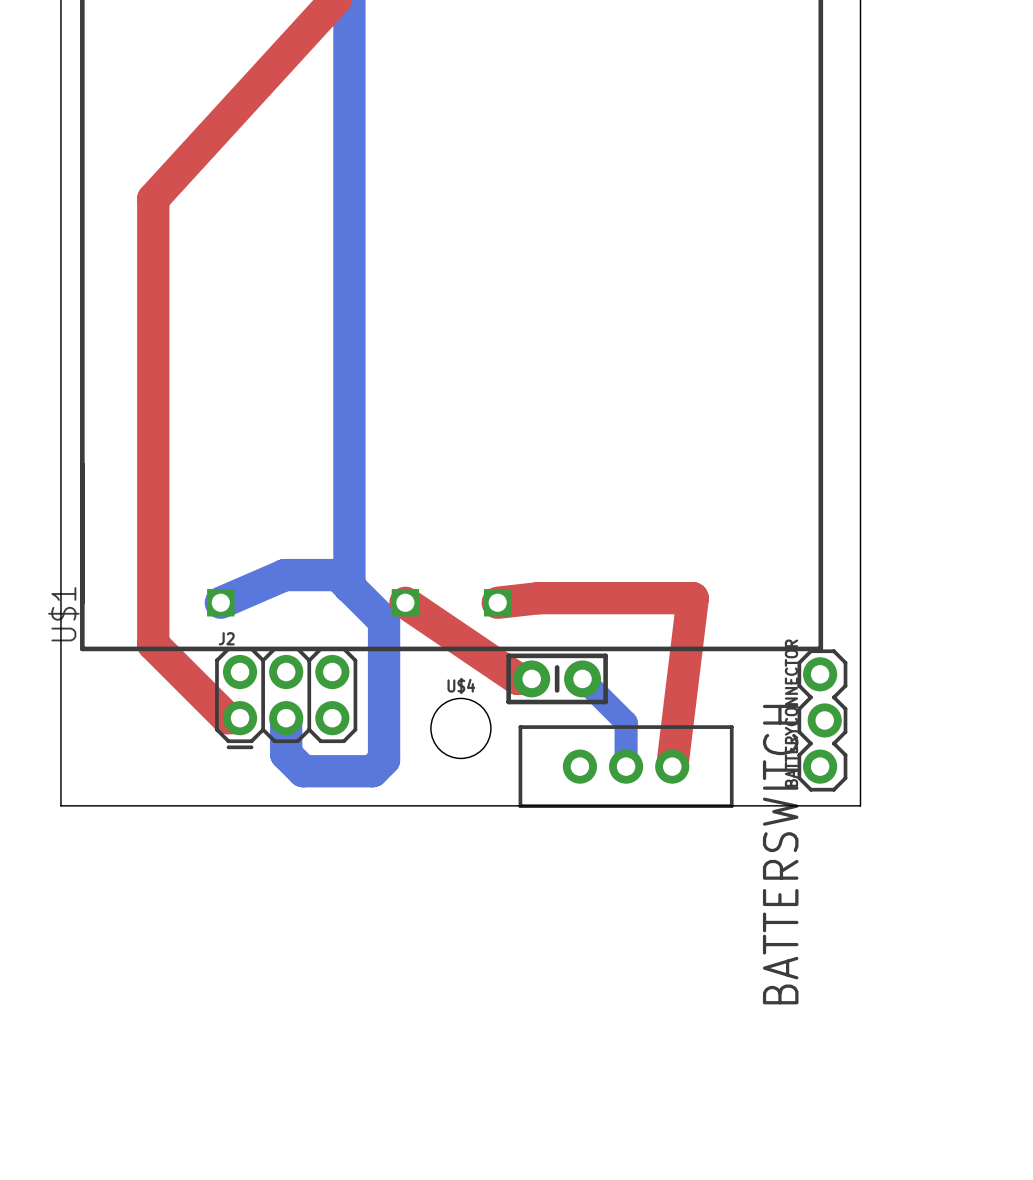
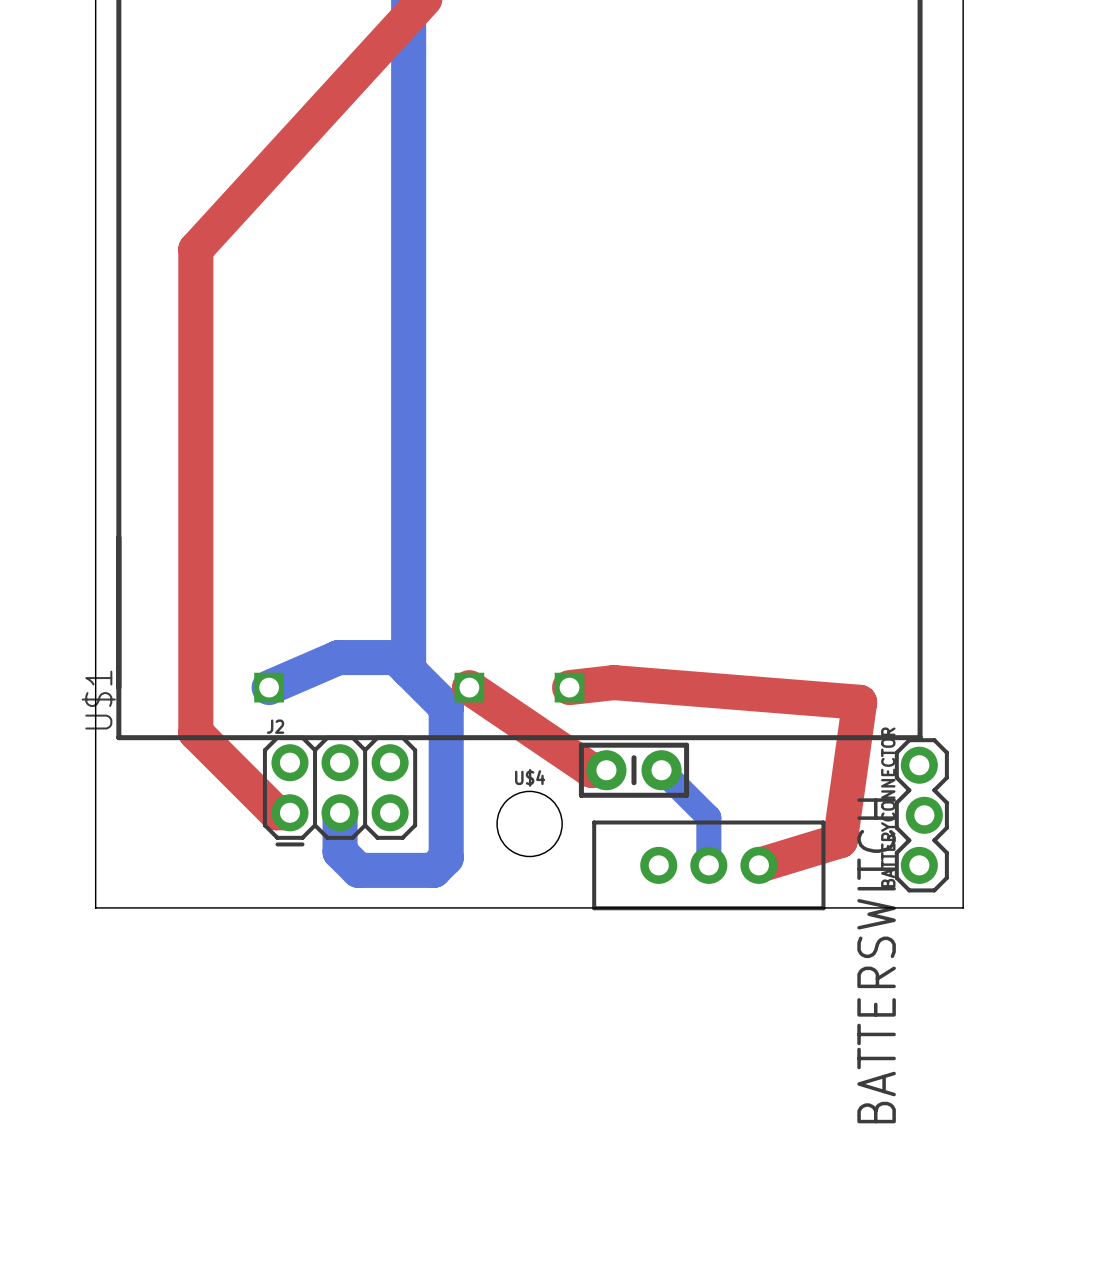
top track: (538, 598) (692, 598) (672, 766) -> (613, 682) (859, 702) (840, 840) (758, 865)

